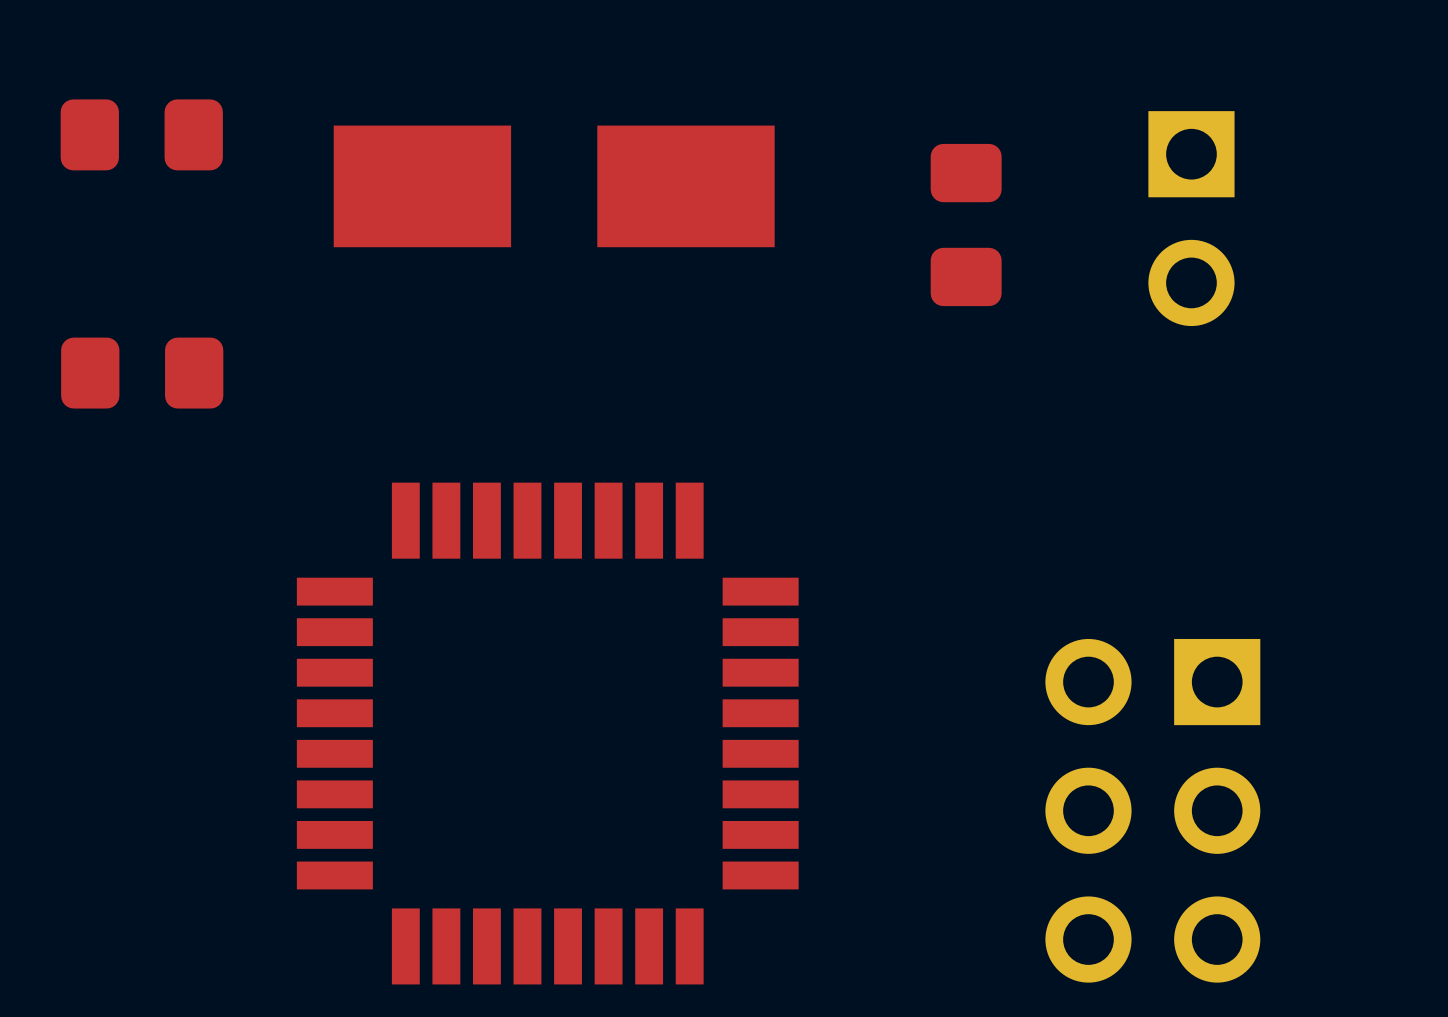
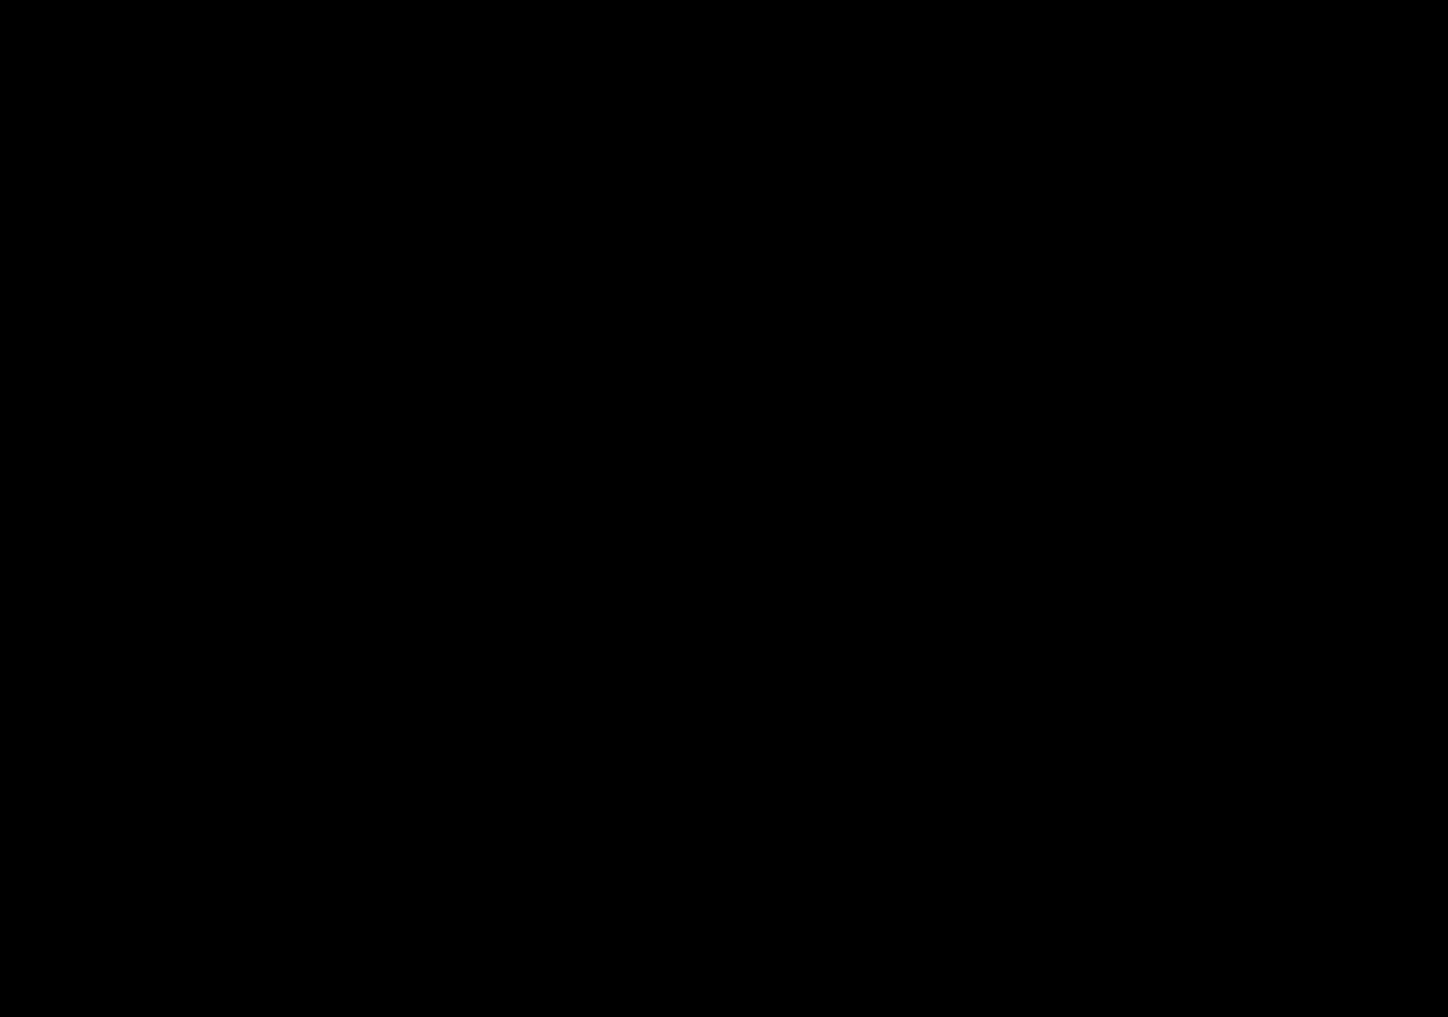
part: (141, 134) -> none
part: (554, 186) -> none
part: (1191, 218) -> none
part: (966, 225) -> none
part: (142, 373) -> none
part: (547, 733) -> none
part: (1152, 810) -> none

